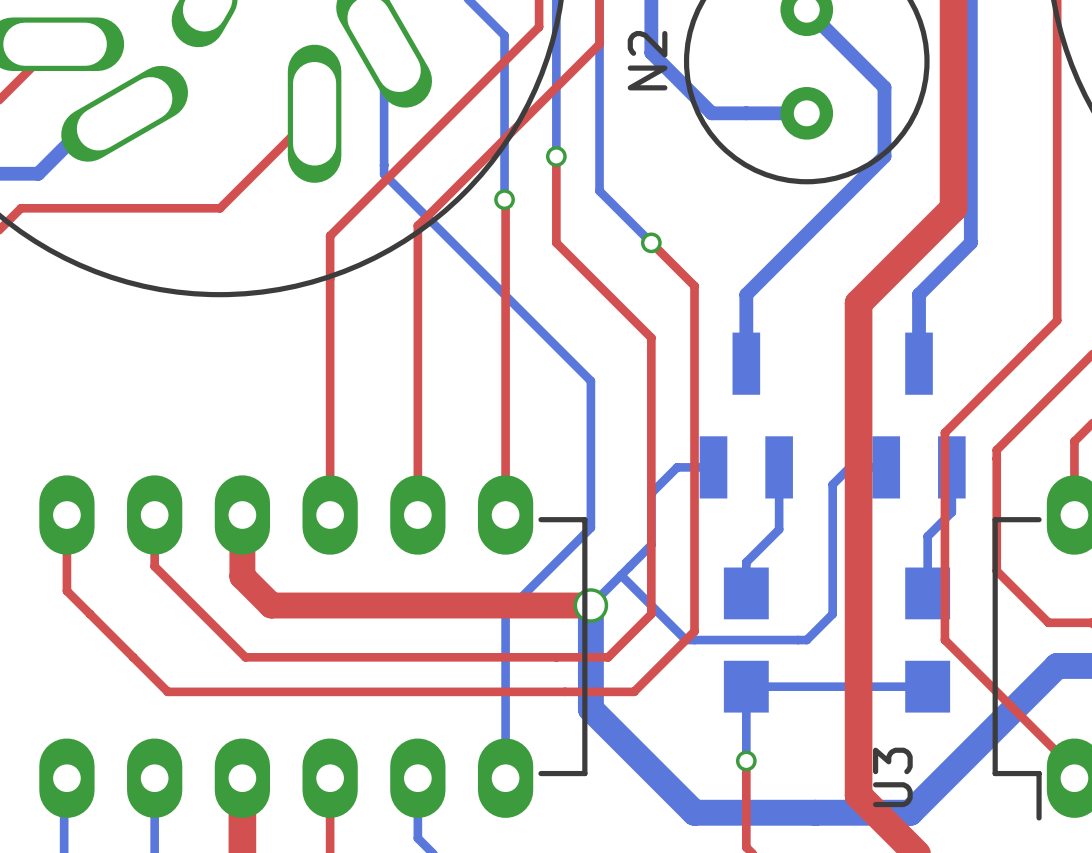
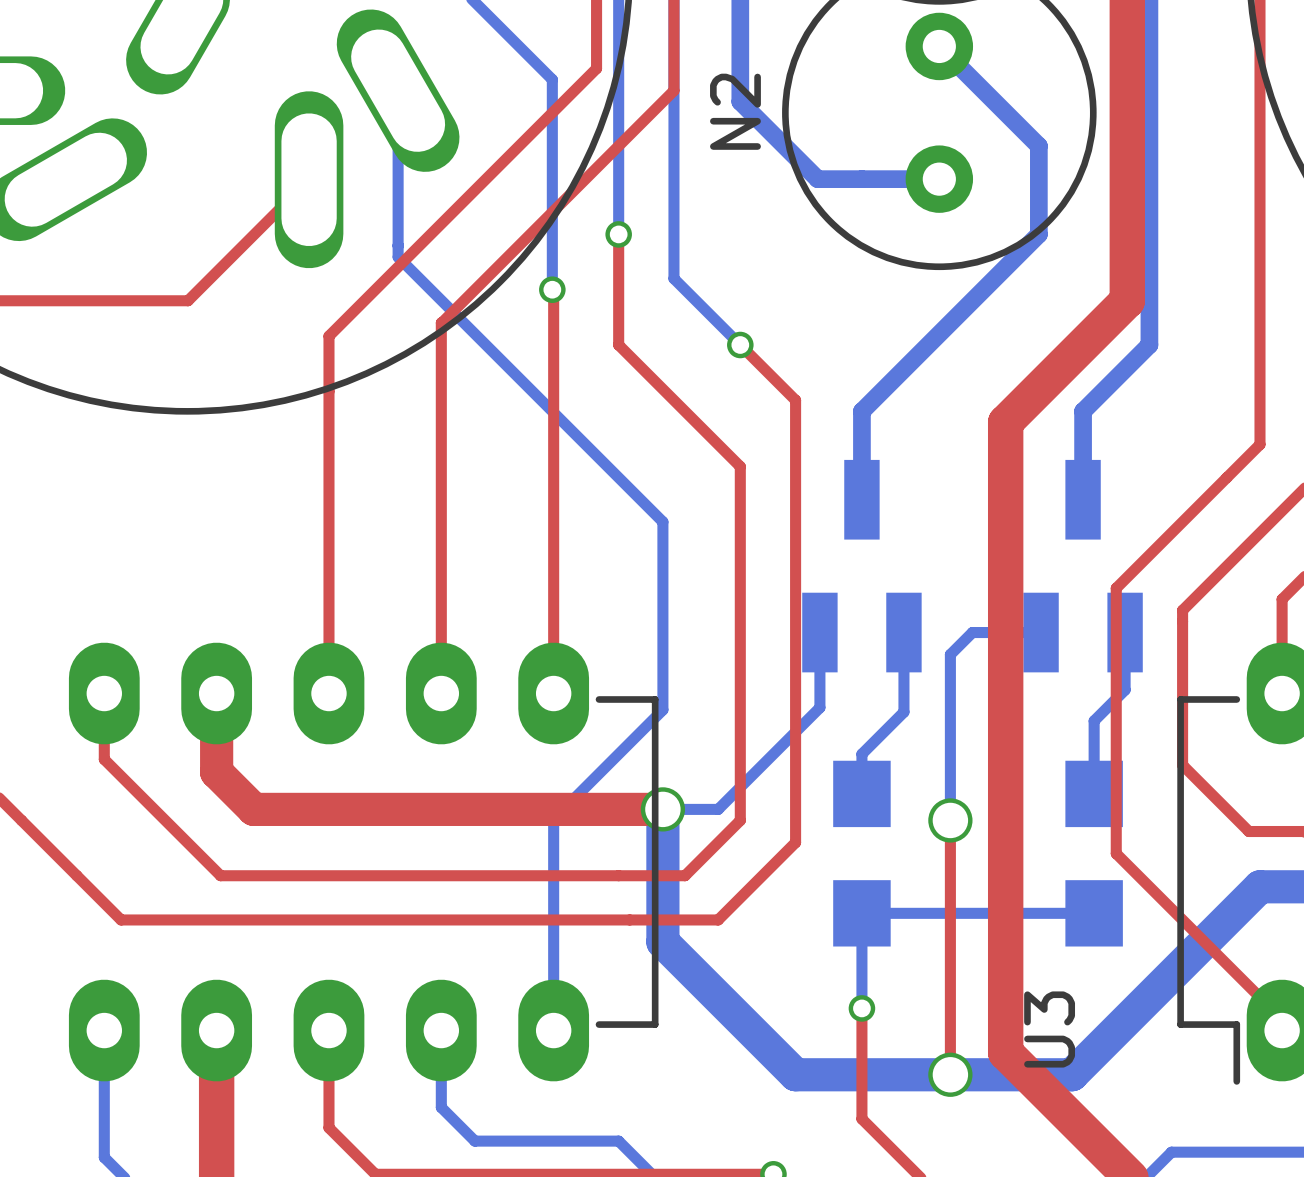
bottom track: (713, 467) (677, 467) (651, 493) (651, 545) (590, 605) -> (819, 632) (819, 707) (718, 809) (662, 809)
bottom track: (849, 467) (832, 484) (832, 614) (806, 640) (685, 640) (621, 575) -> (994, 632) (972, 632) (950, 654) (950, 820)
via: none -> (950, 820)
top track: none -> (939, 831) (950, 820) (950, 1074)
via: none -> (950, 1074)

